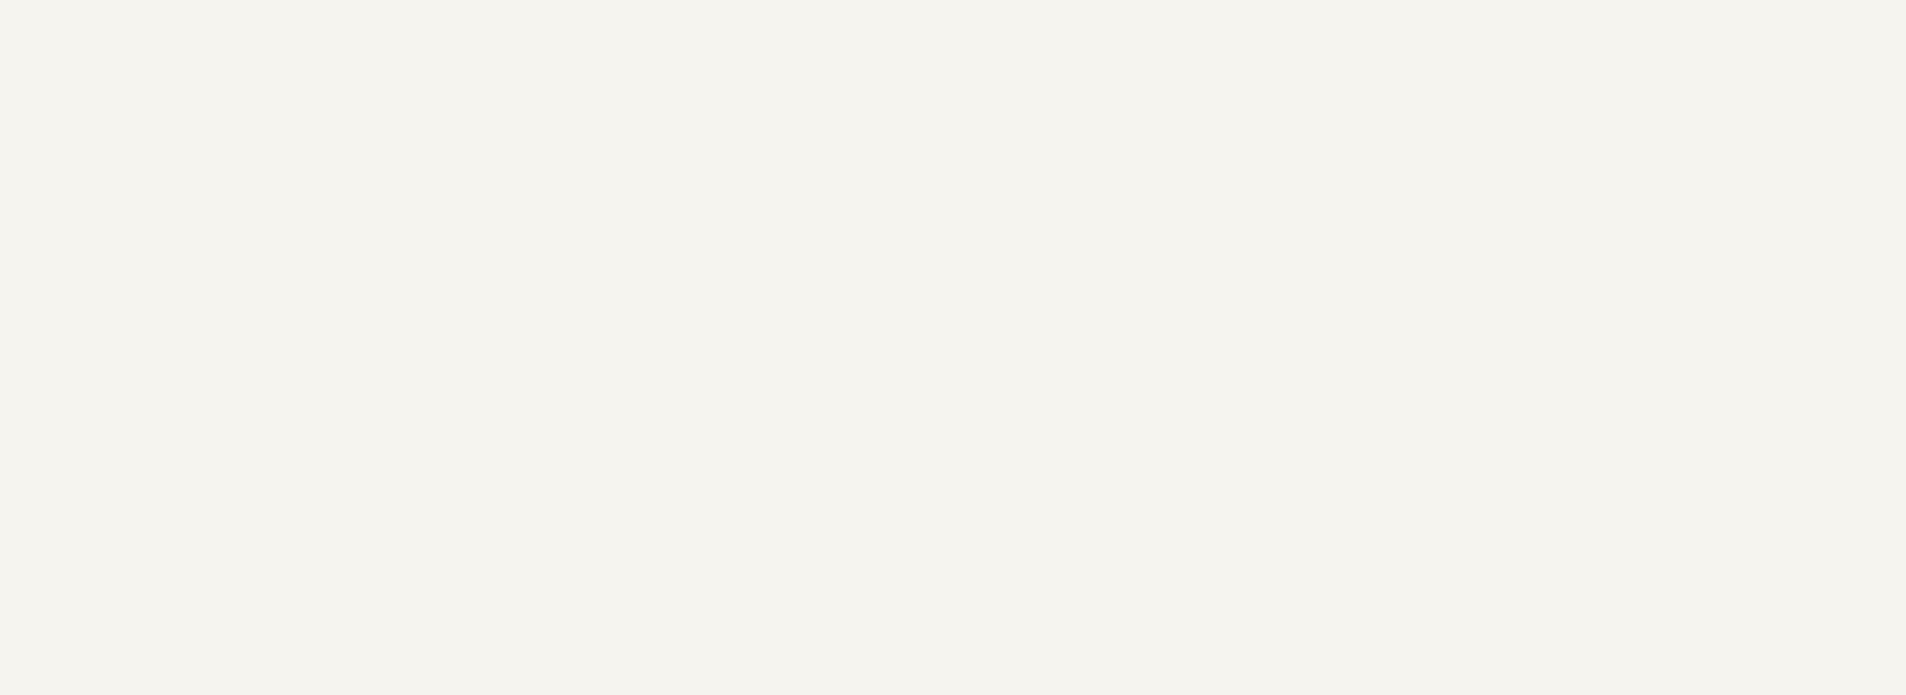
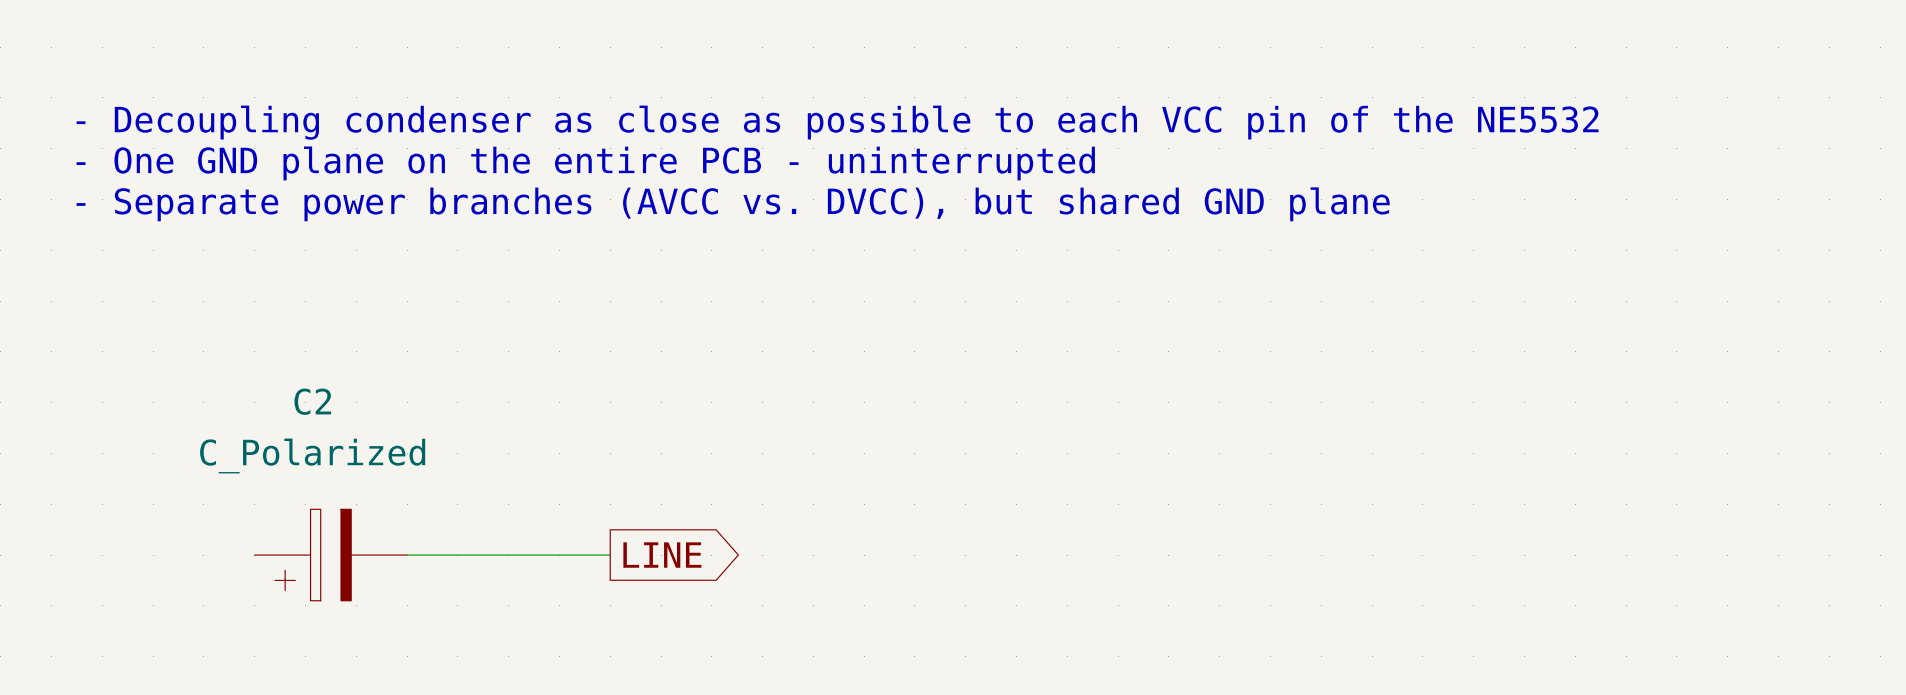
text: none -> - Decoupling condenser as close as possible to each VCC pin of the NE5532 (837, 122)
text: none -> - One GND plane on the entire PCB - uninterrupted (585, 163)
text: none -> - Separate power branches (AVCC vs. DVCC), but shared GND plane (733, 204)
C2: none -> C_Polarized (330, 555)
wire: none -> (407, 555) (610, 555)
global label: none -> LINE (662, 555)

